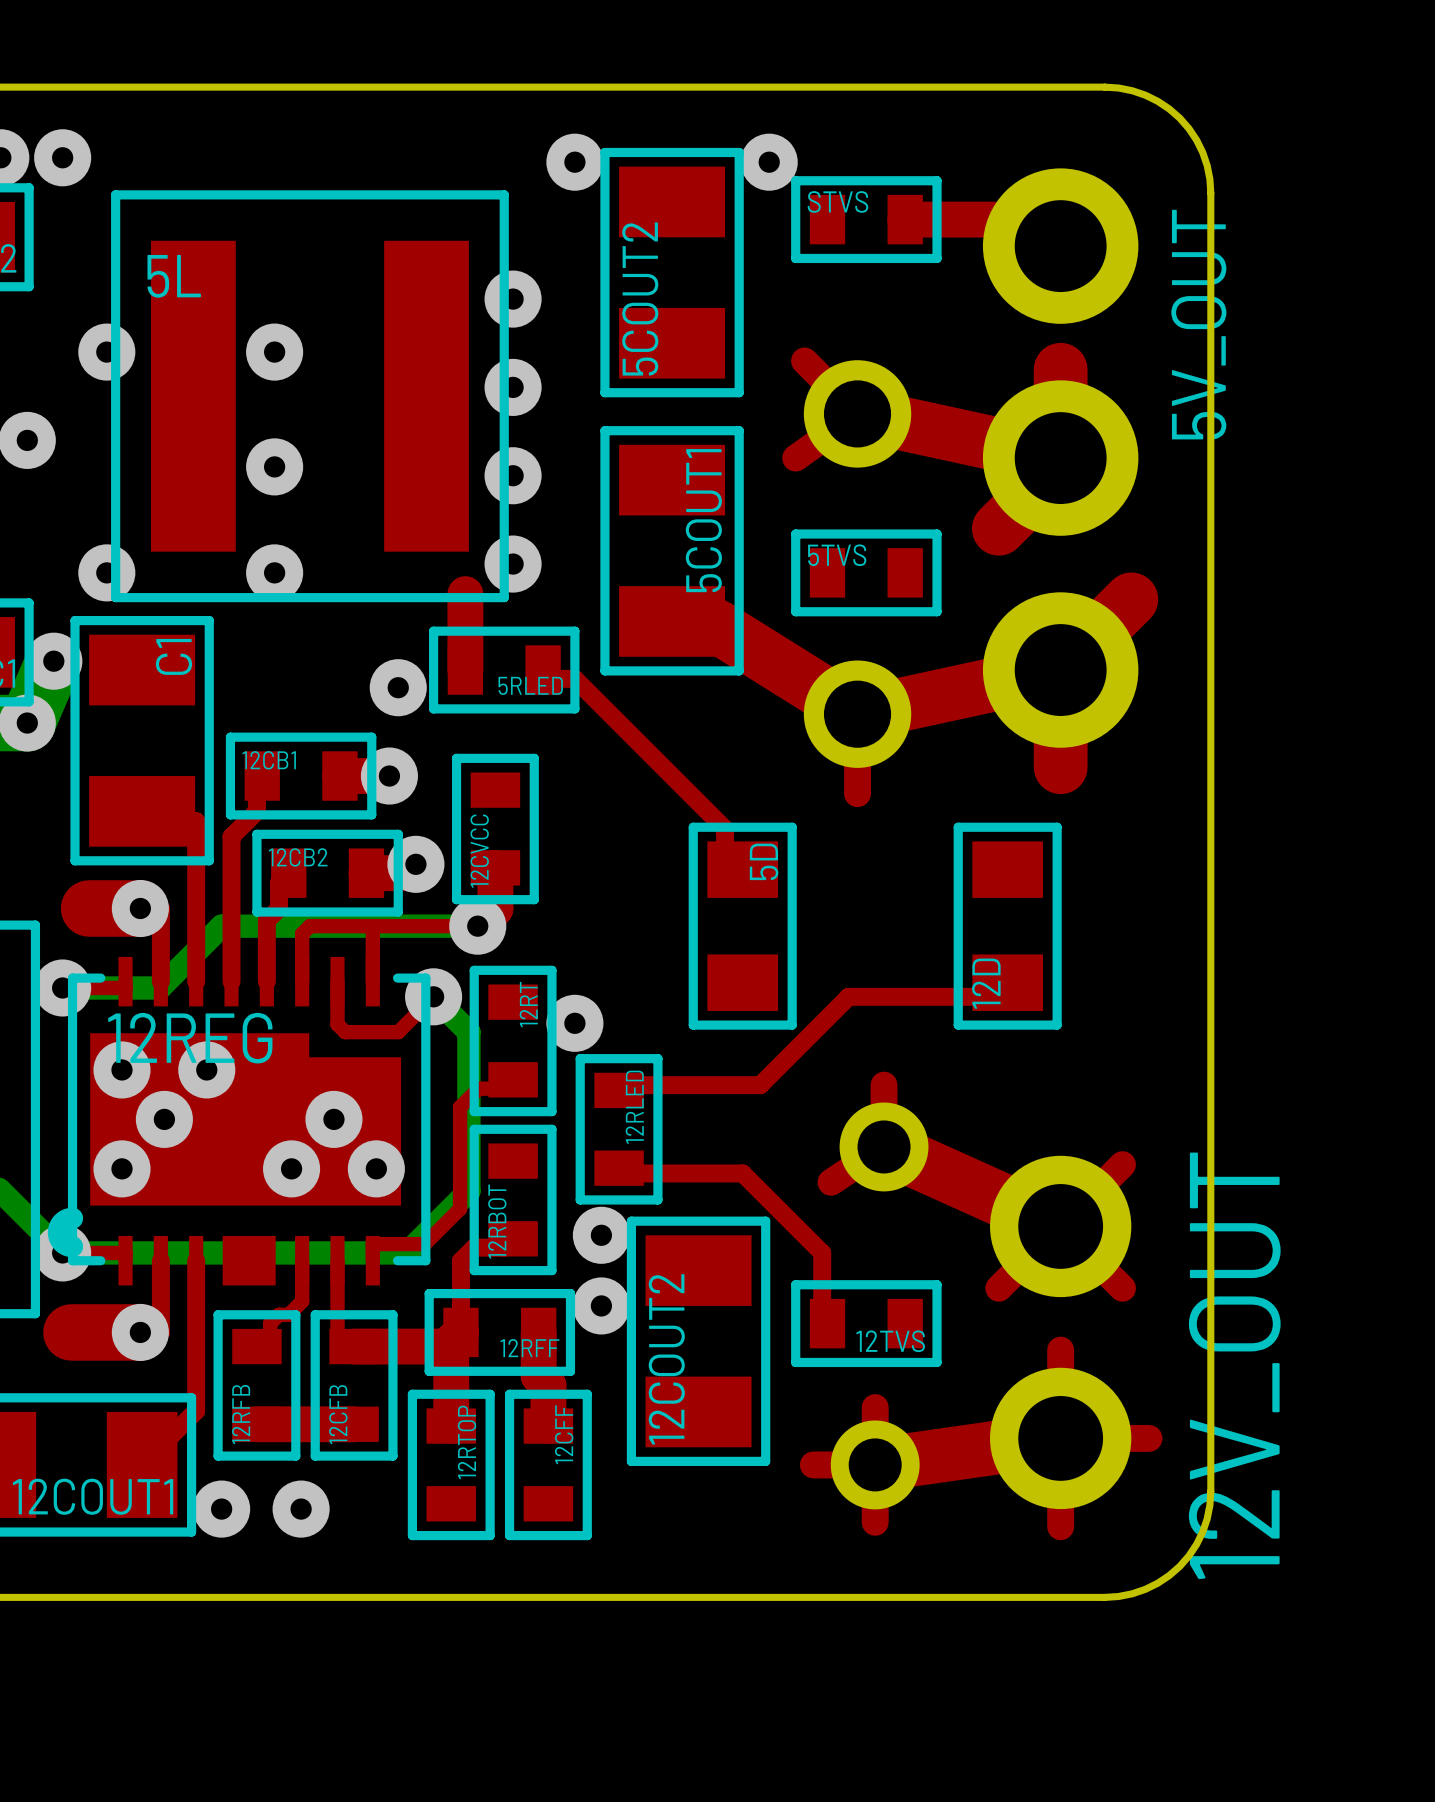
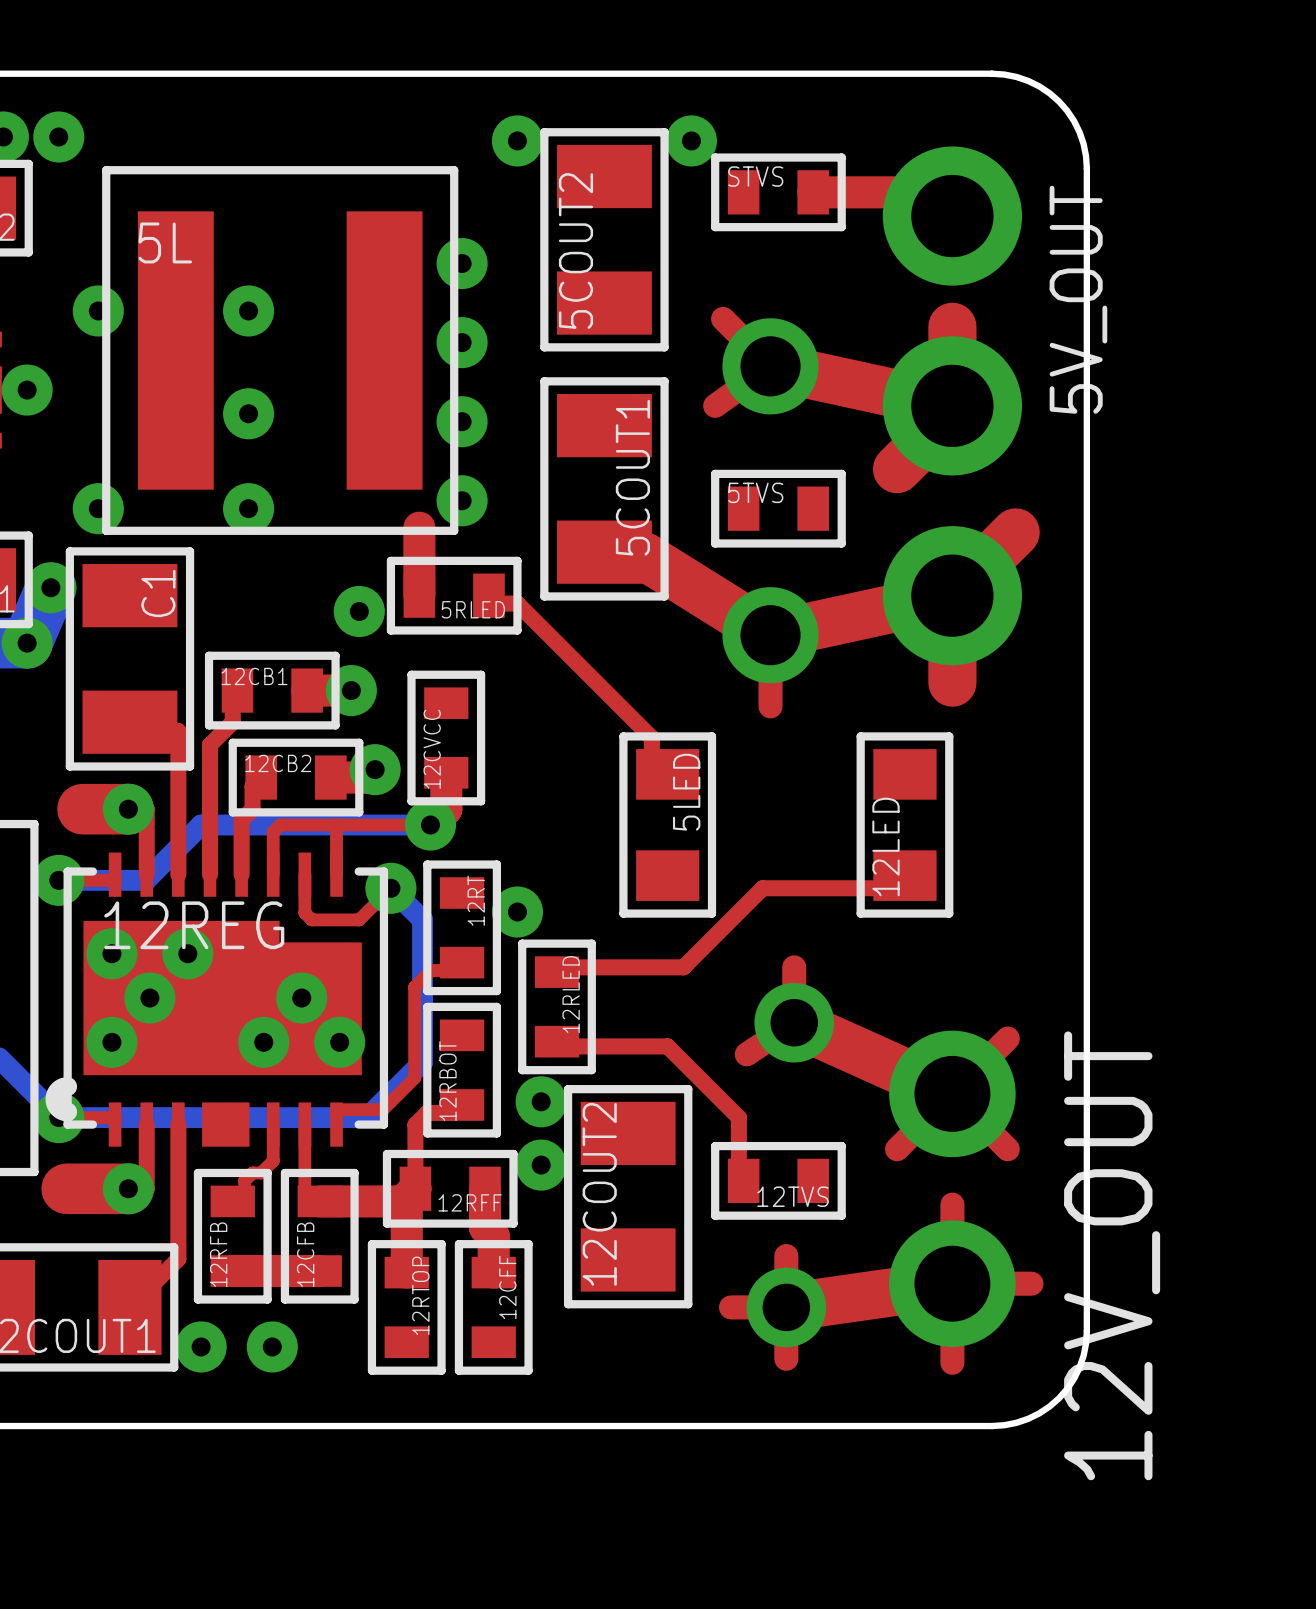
5D name: 5D (764, 861) -> 5LED (686, 792)
12D name: 12D (986, 983) -> 12LED (885, 846)

